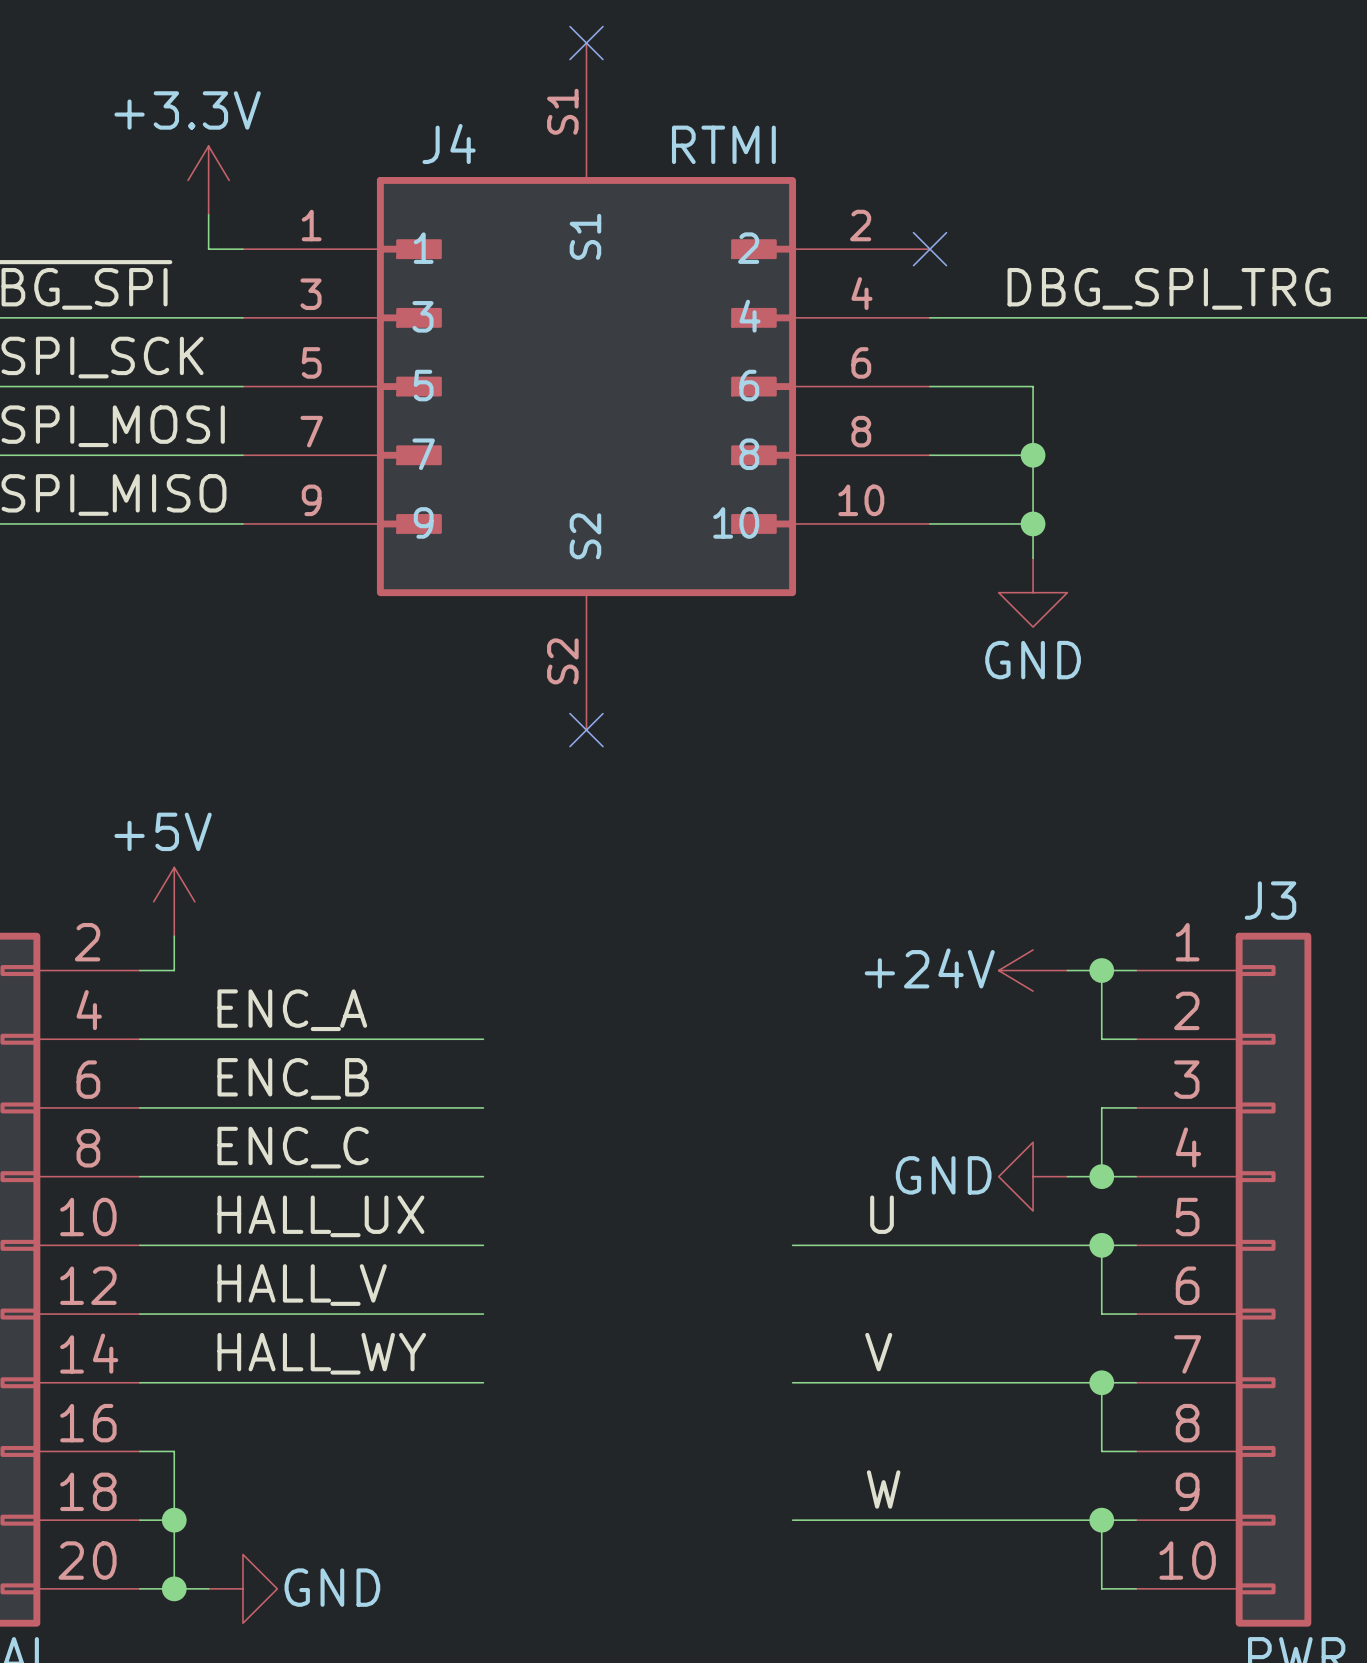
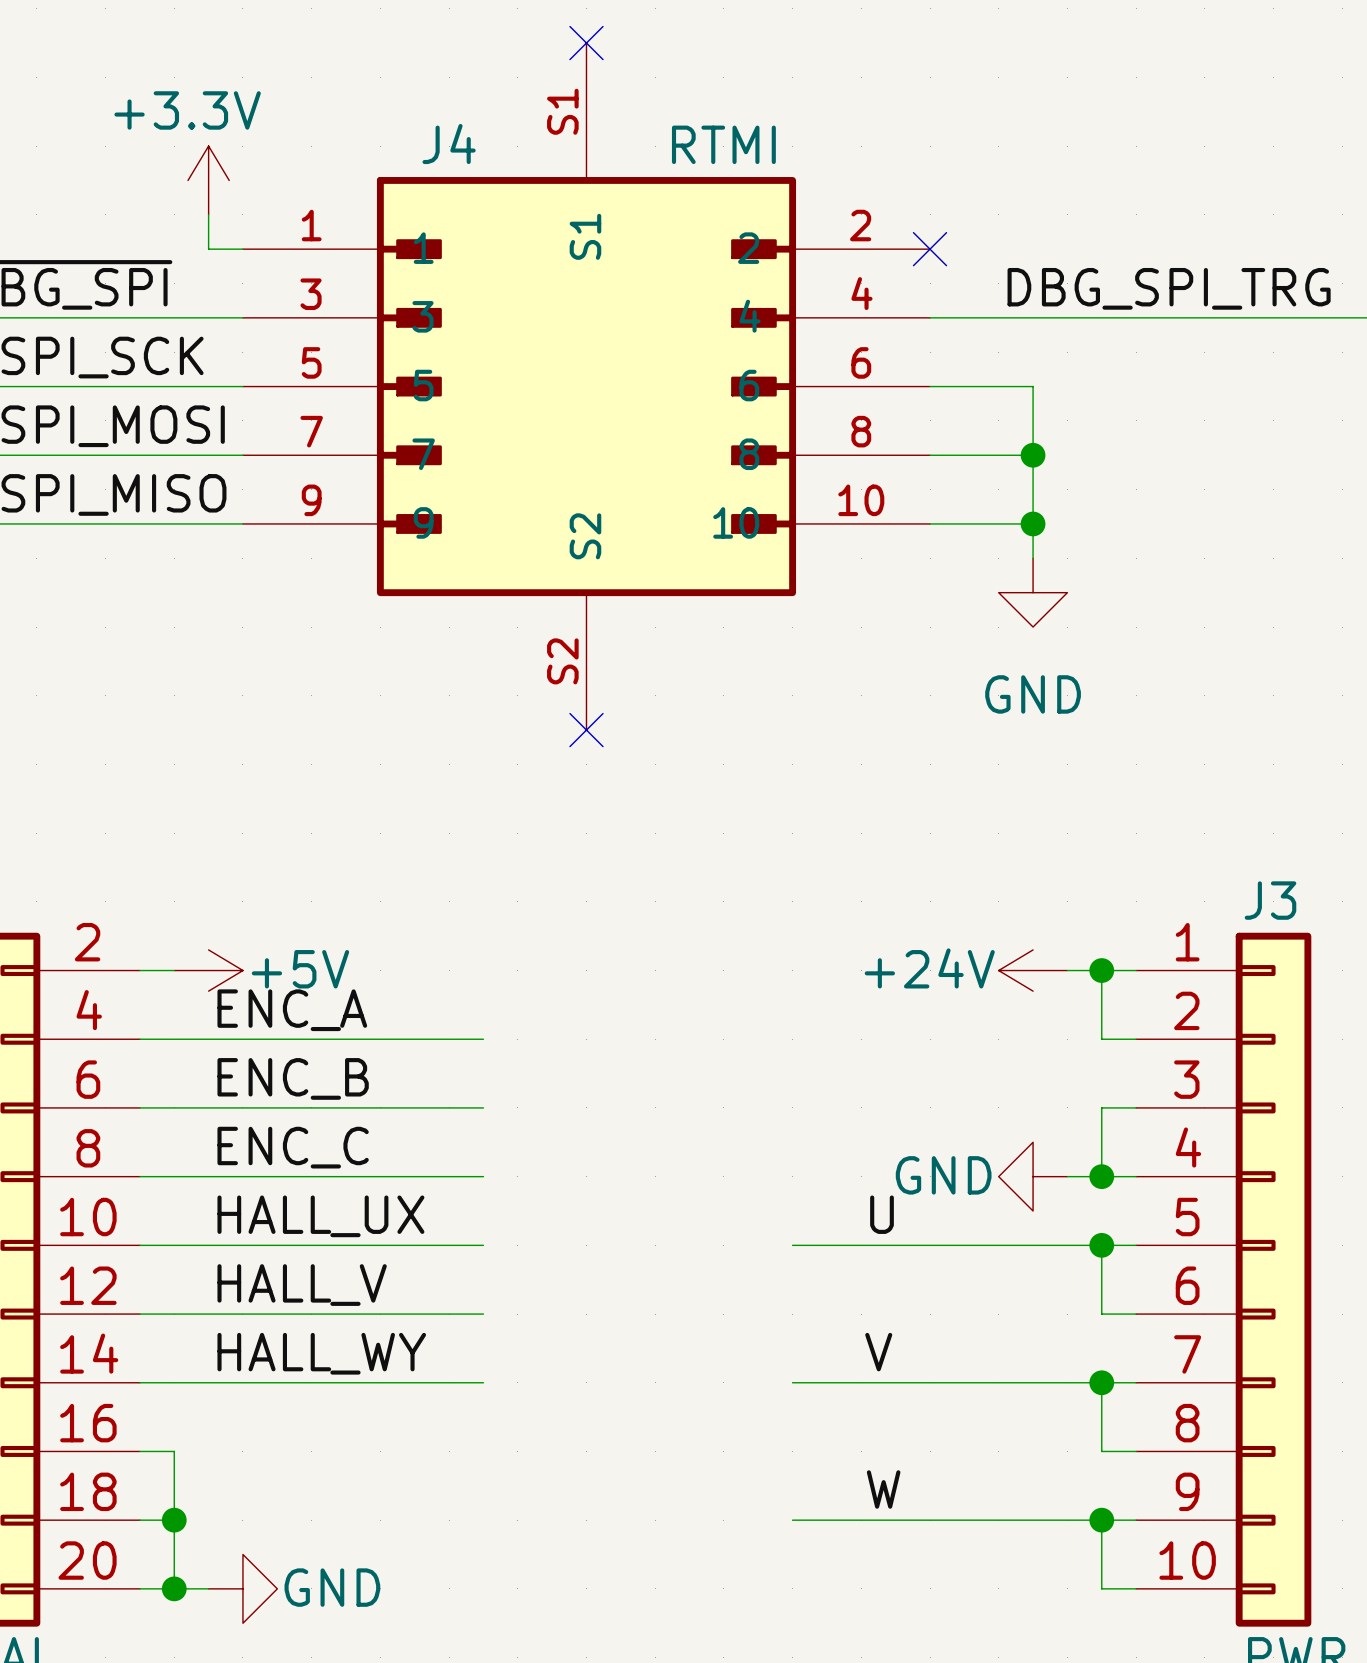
power symbol text position: GND (1033, 660) -> GND (1033, 694)
power symbol rotation: 0° (174, 901) -> 90° clockwise (208, 970)
power symbol position: +5V (174, 901) -> +5V (208, 970)
wire: (174, 936) (174, 970) -> none

